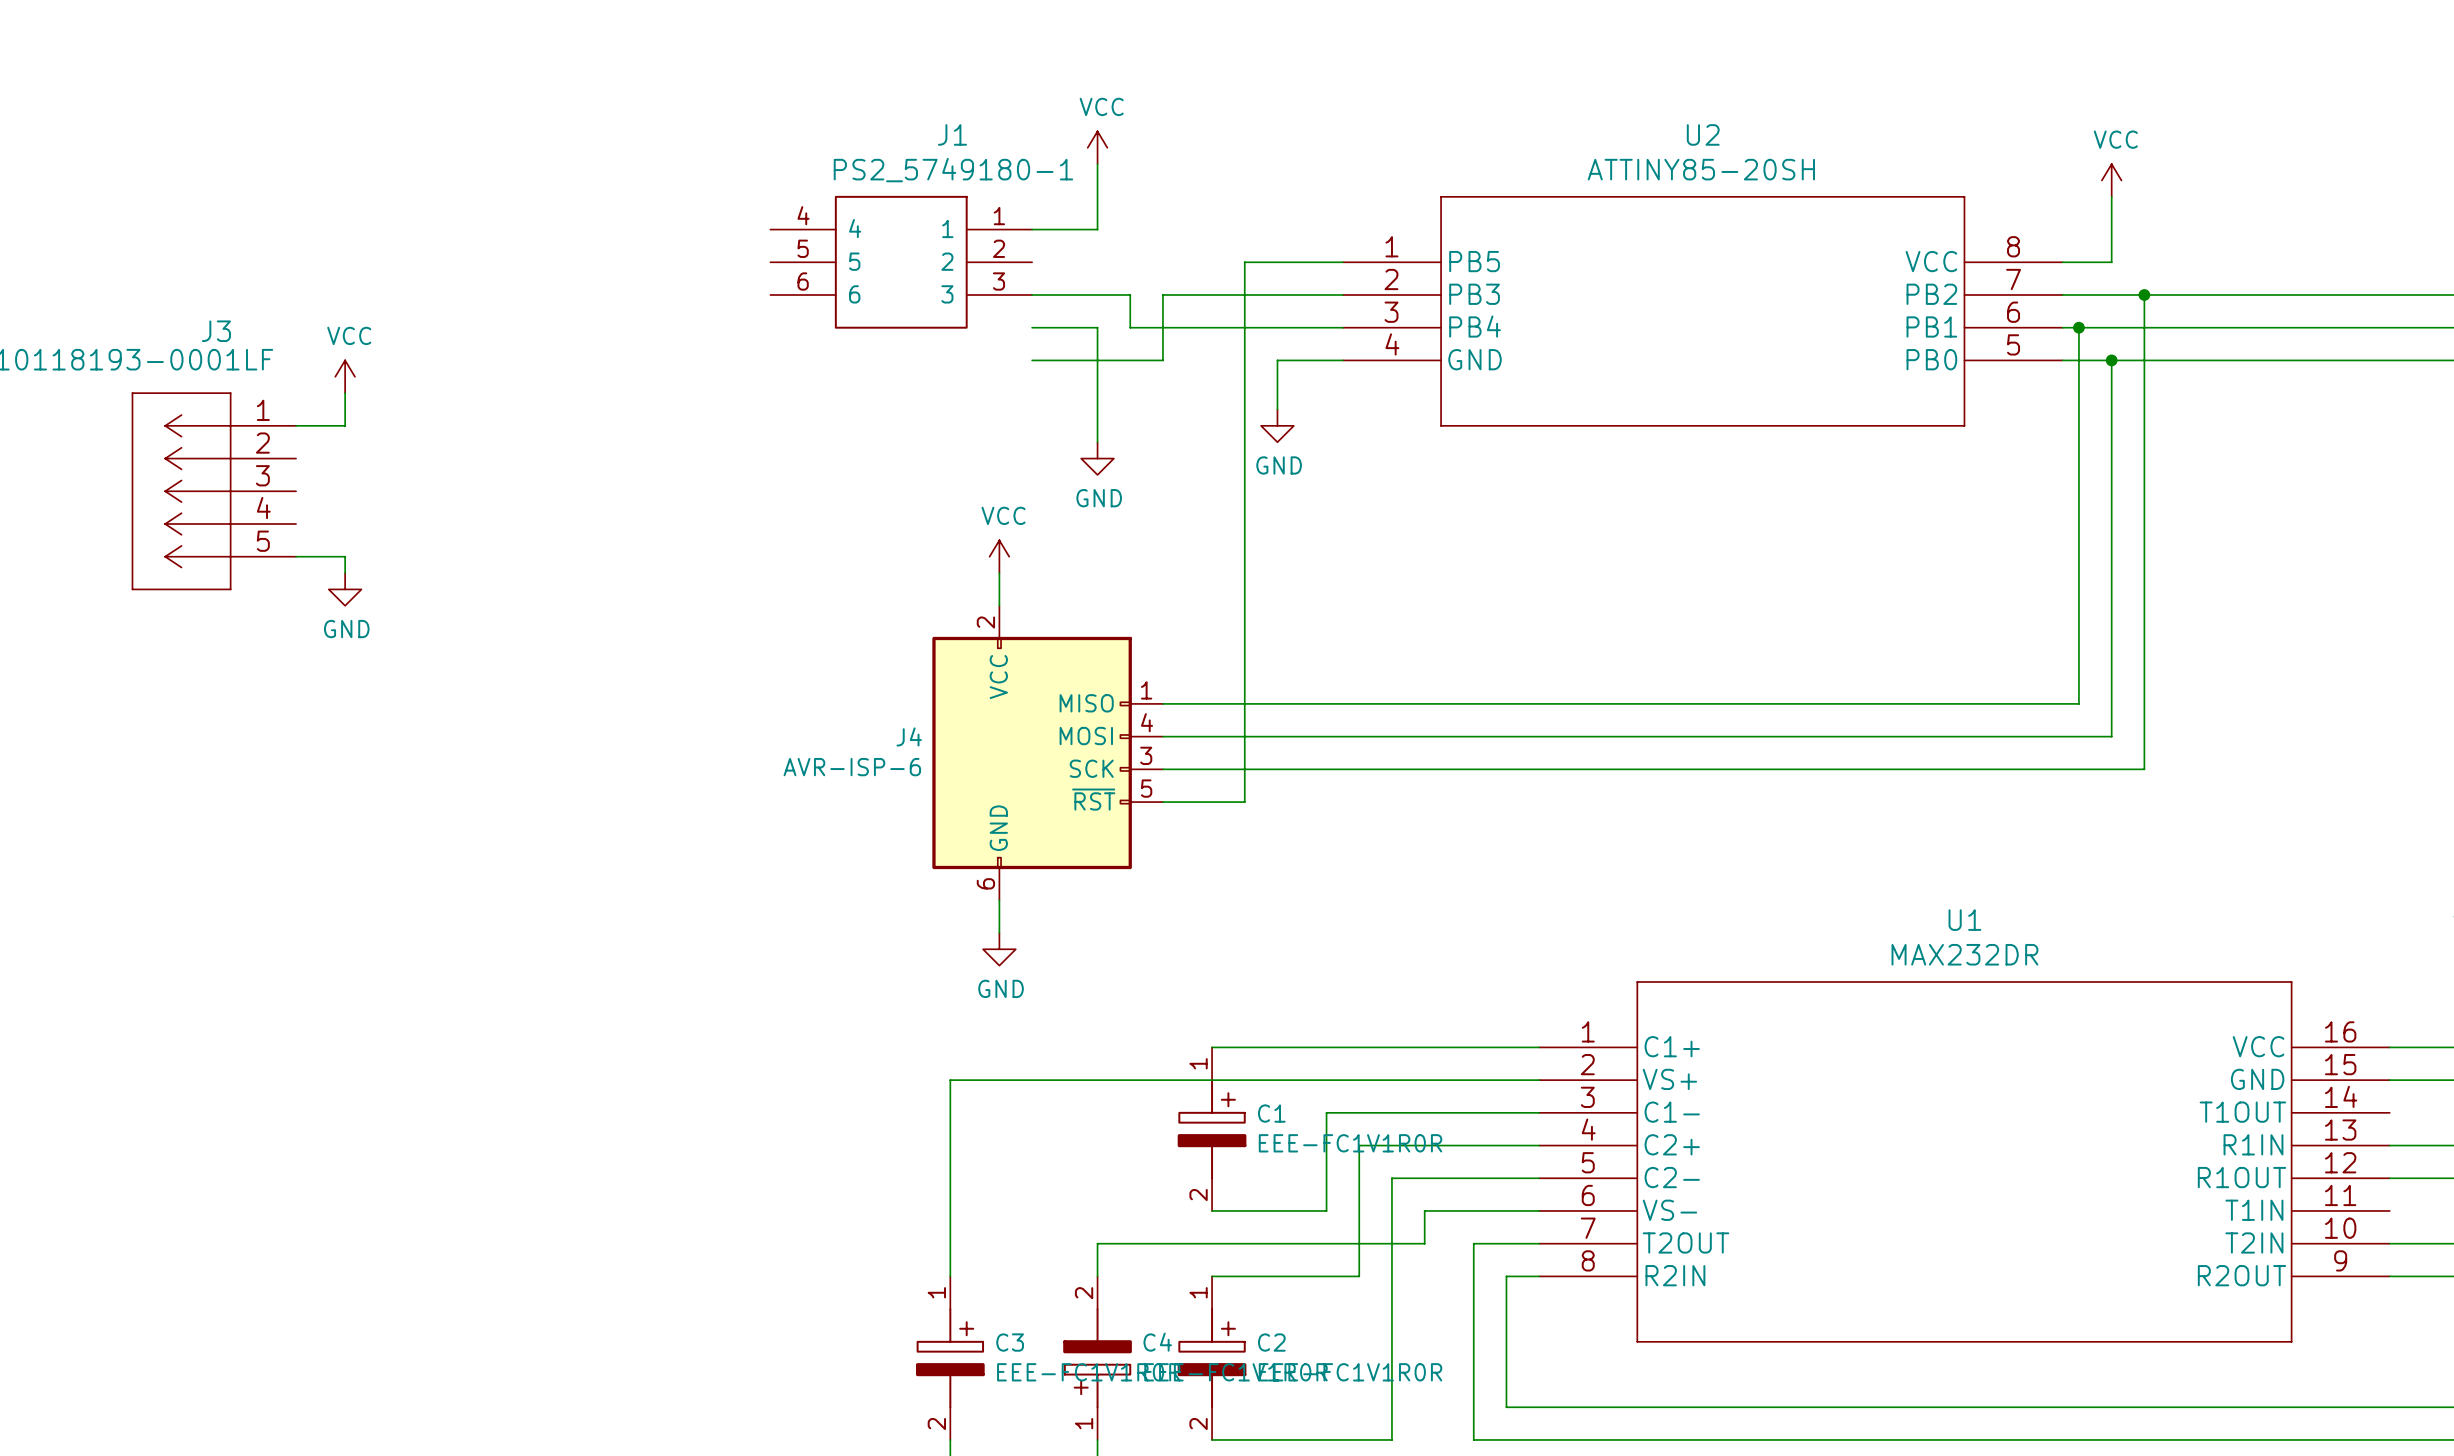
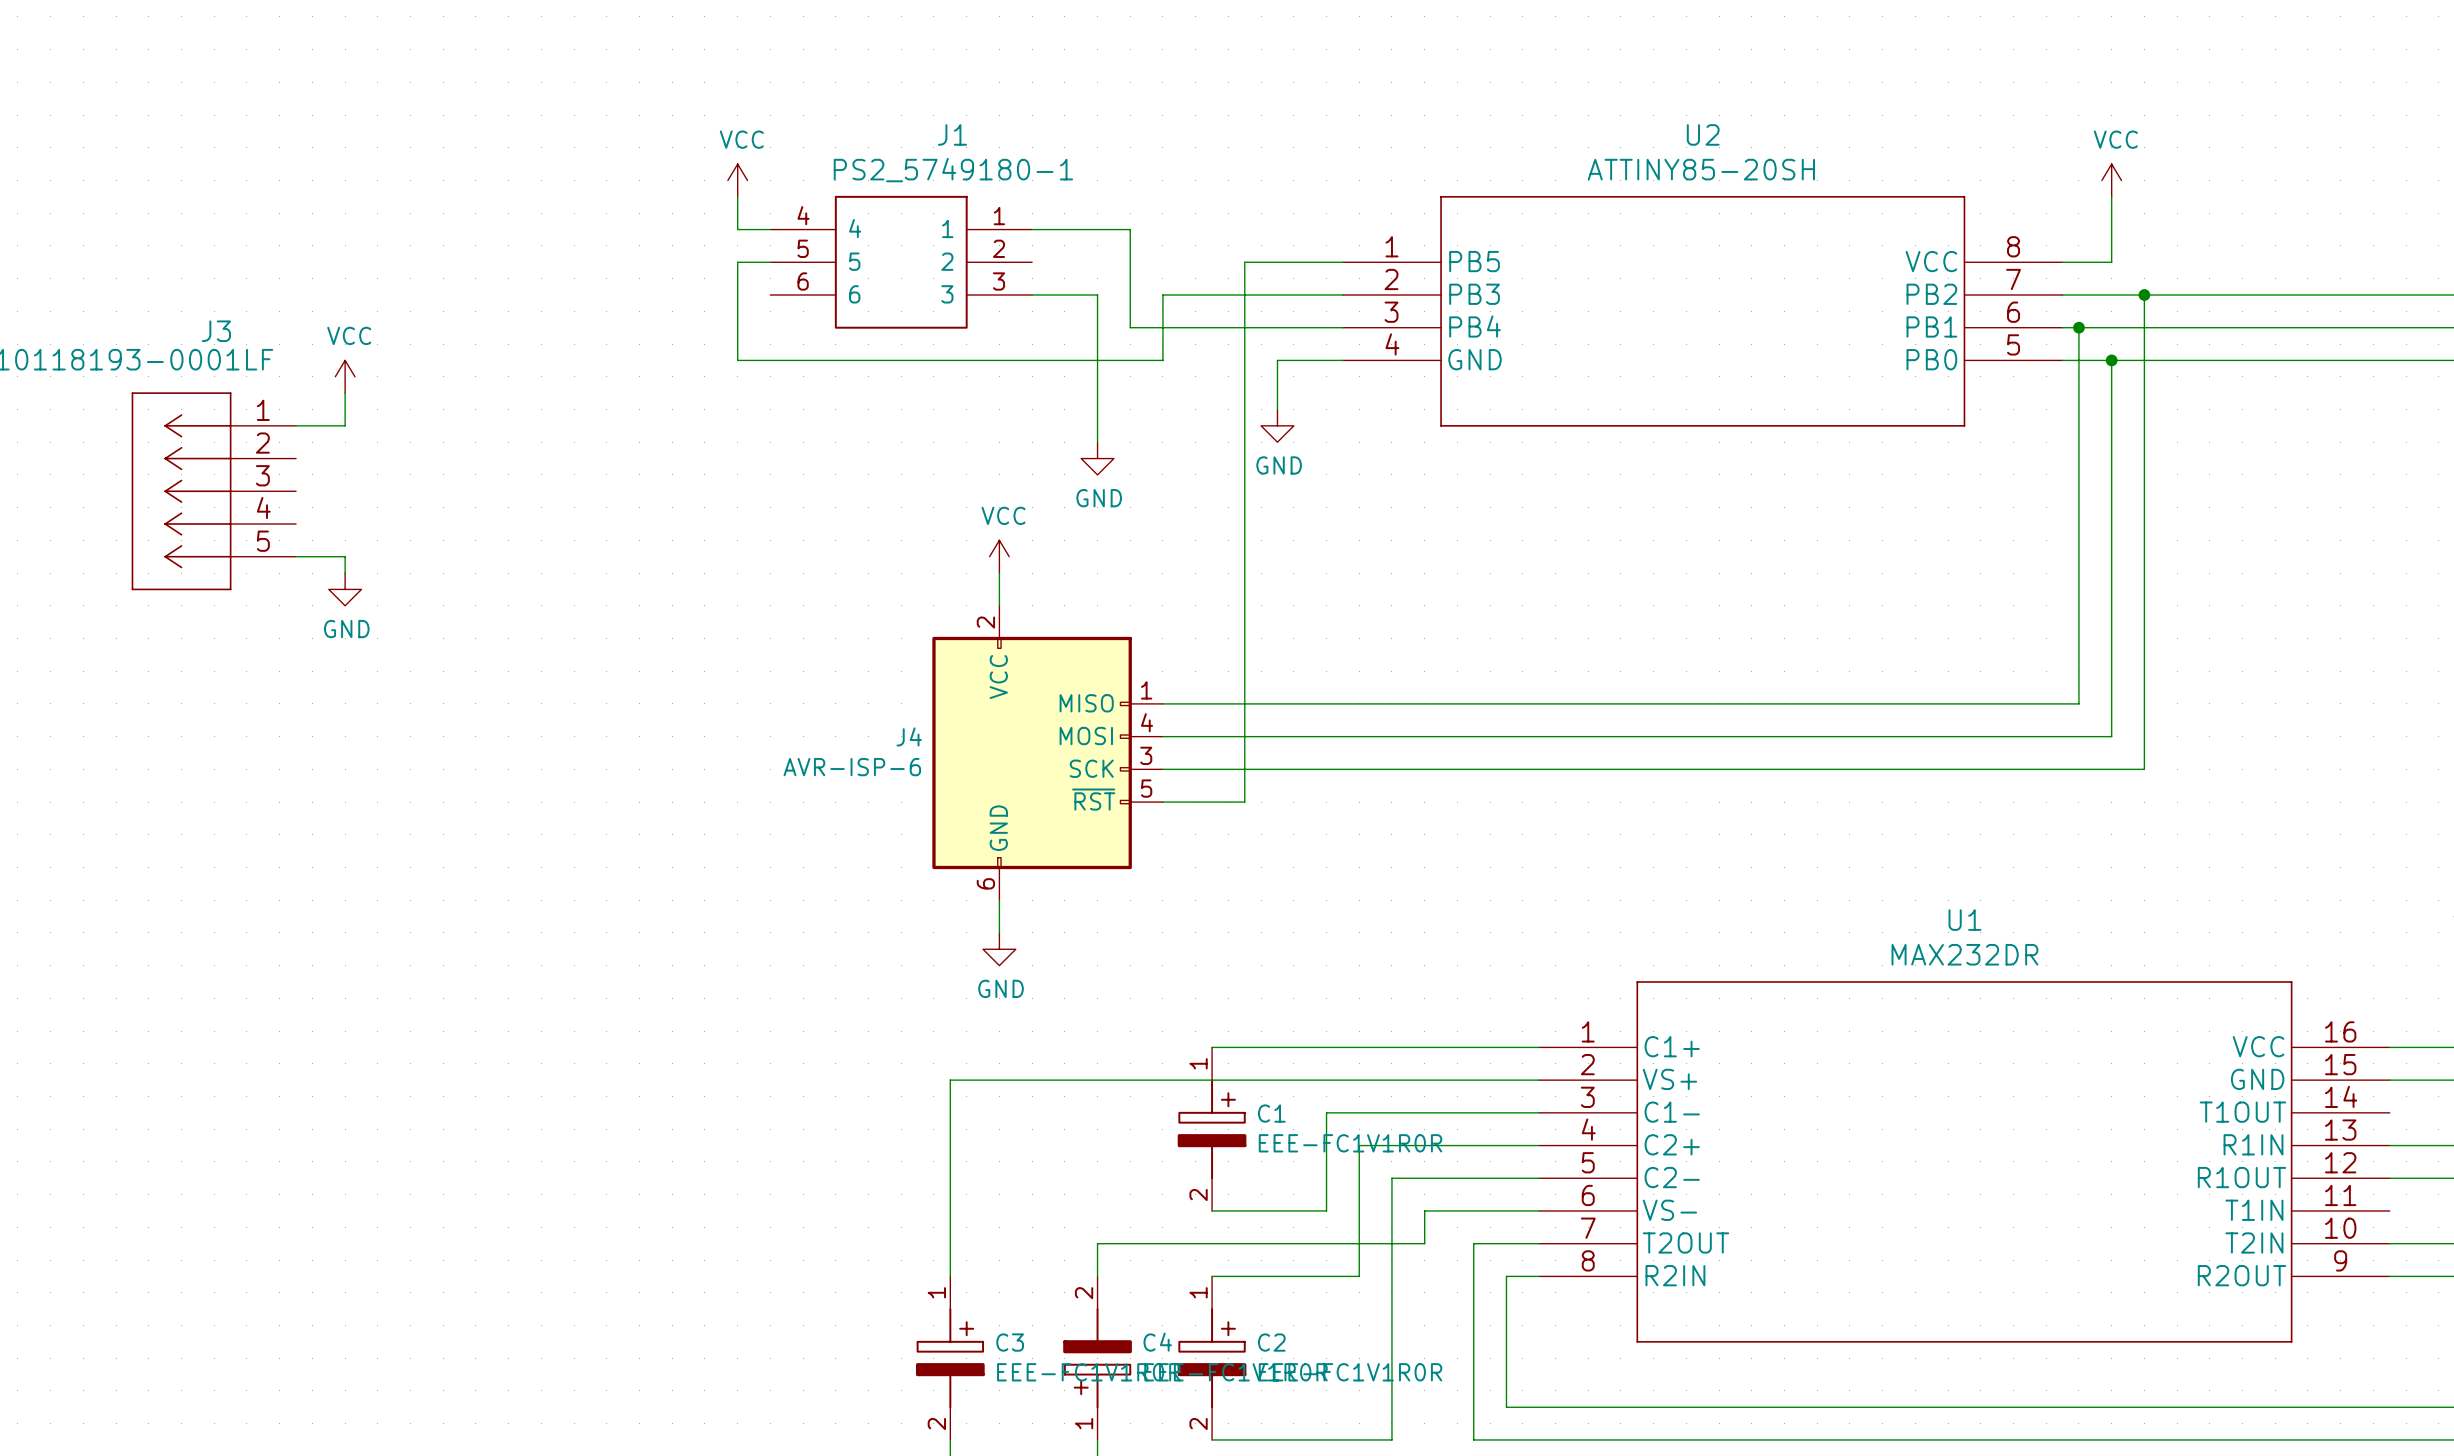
power symbol: VCC (1097, 147) -> none
wire: (1097, 164) (1097, 229) -> (1130, 294) (1130, 229) (1097, 229)
power symbol: none -> VCC (737, 180)
wire: none -> (737, 196) (737, 229) (770, 229)
wire: none -> (770, 262) (737, 262) (737, 360) (1032, 360)
wire: (1097, 294) (1130, 294) -> (1097, 294) (1097, 327)
wire: (1032, 327) (1097, 327) -> none

